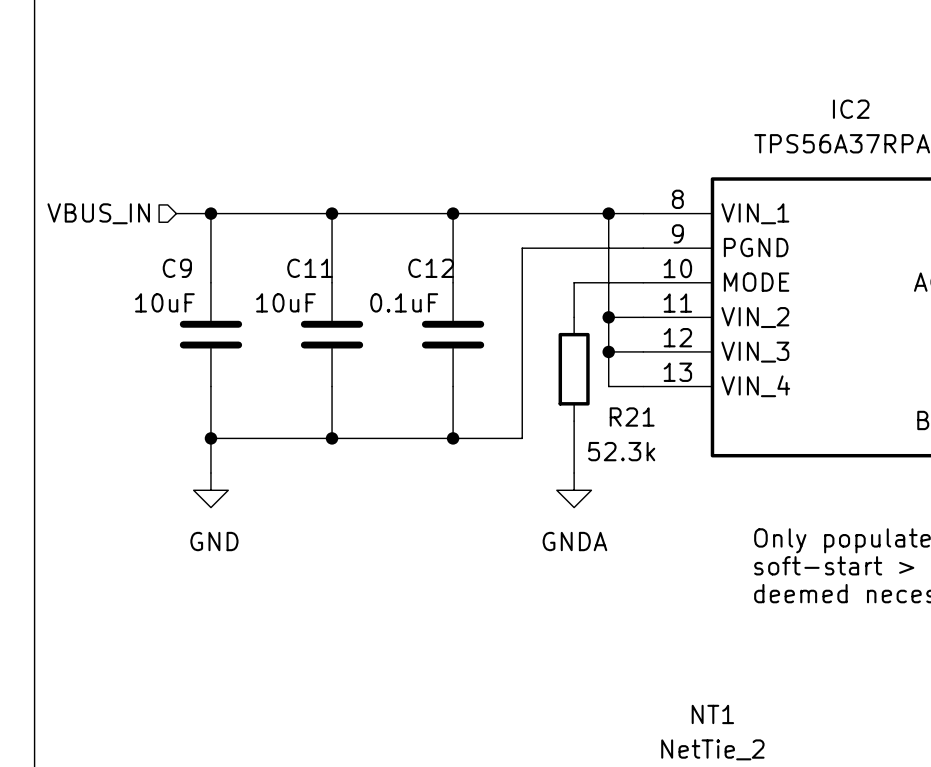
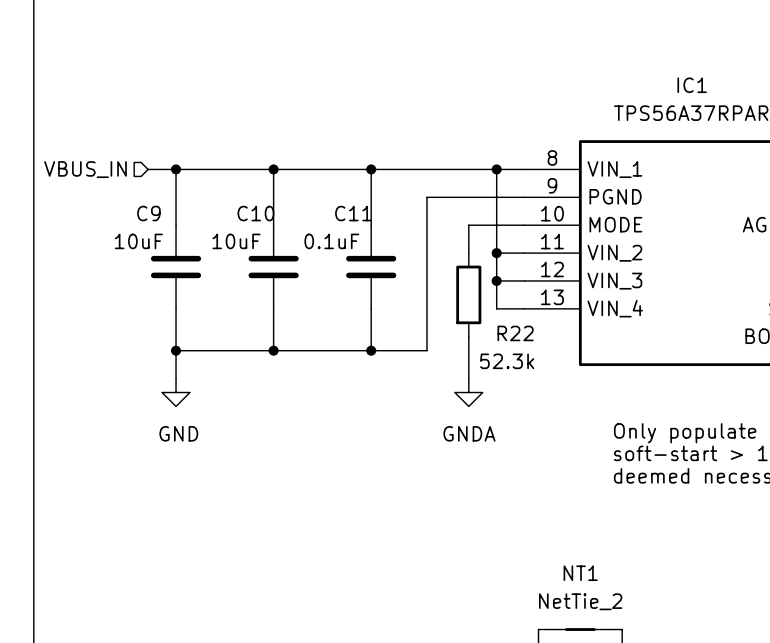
IC2 name: IC2 (851, 109) -> IC1 (692, 85)
C11 name: C11 (310, 268) -> C10 (255, 213)
C12 name: C12 (431, 268) -> C11 (353, 213)
R21 name: R21 (632, 417) -> R22 (515, 333)

